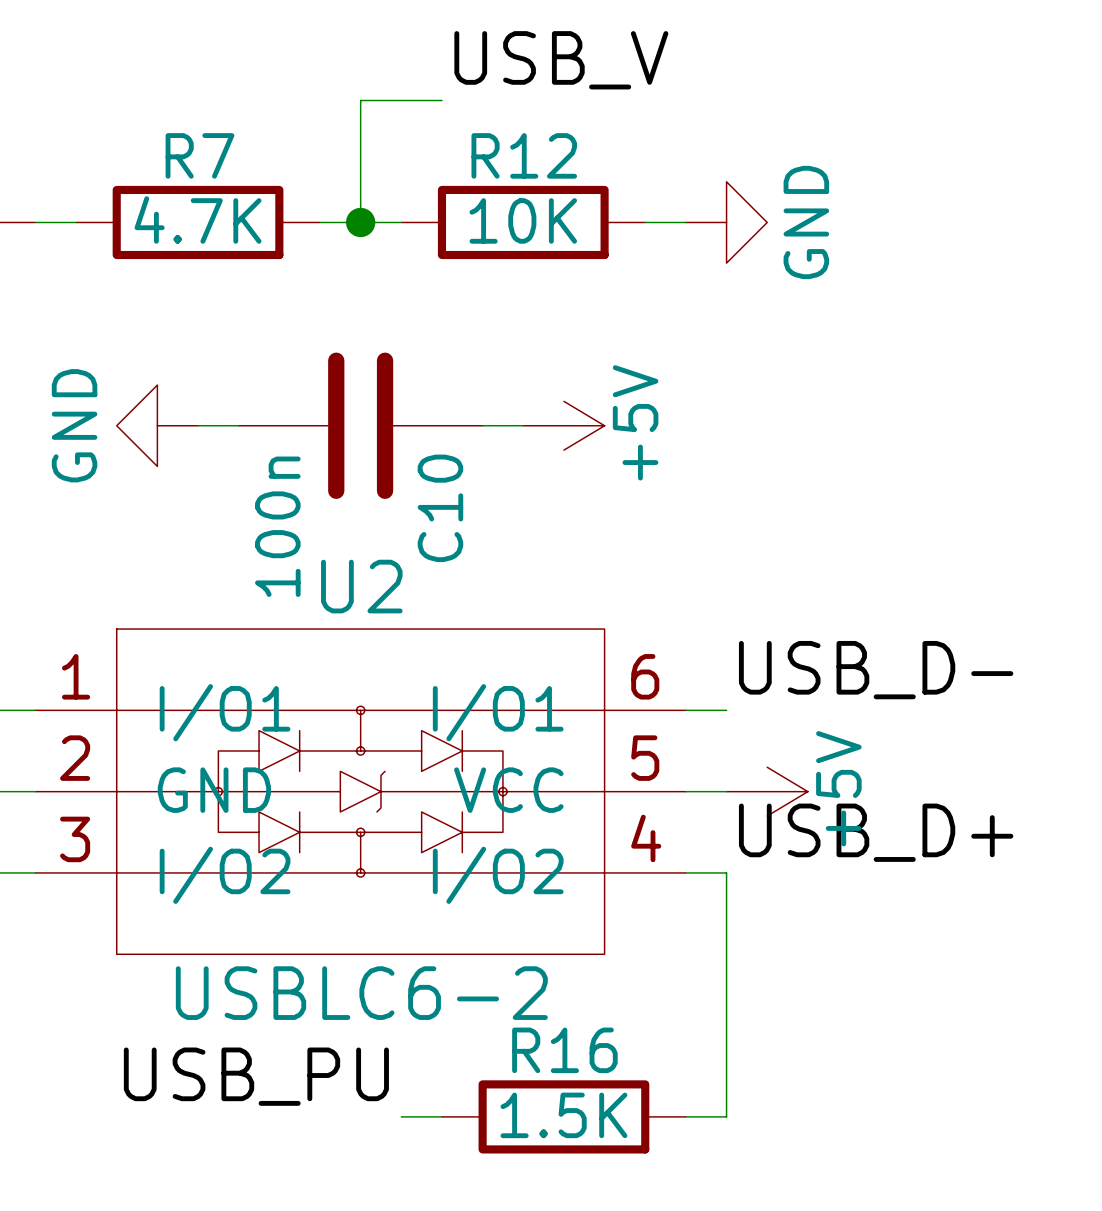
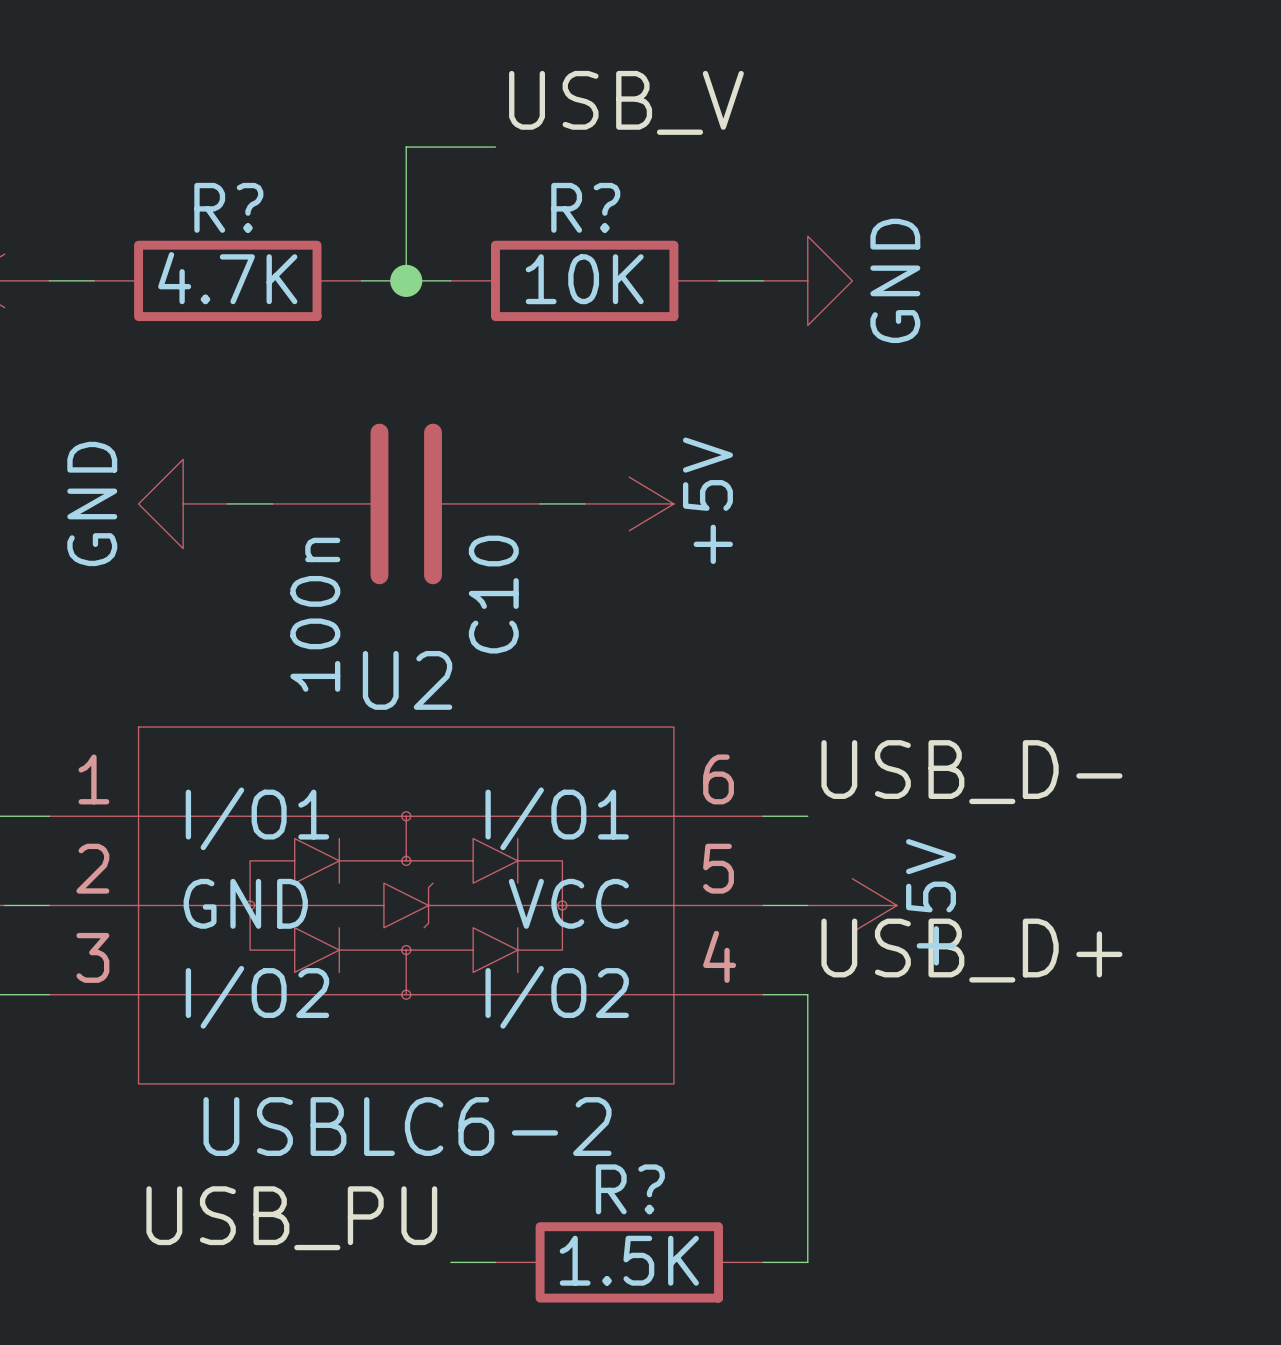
R7 name: R7 (199, 155) -> R? (228, 207)
R12 name: R12 (524, 155) -> R? (585, 207)
R16 name: R16 (564, 1050) -> R? (630, 1189)

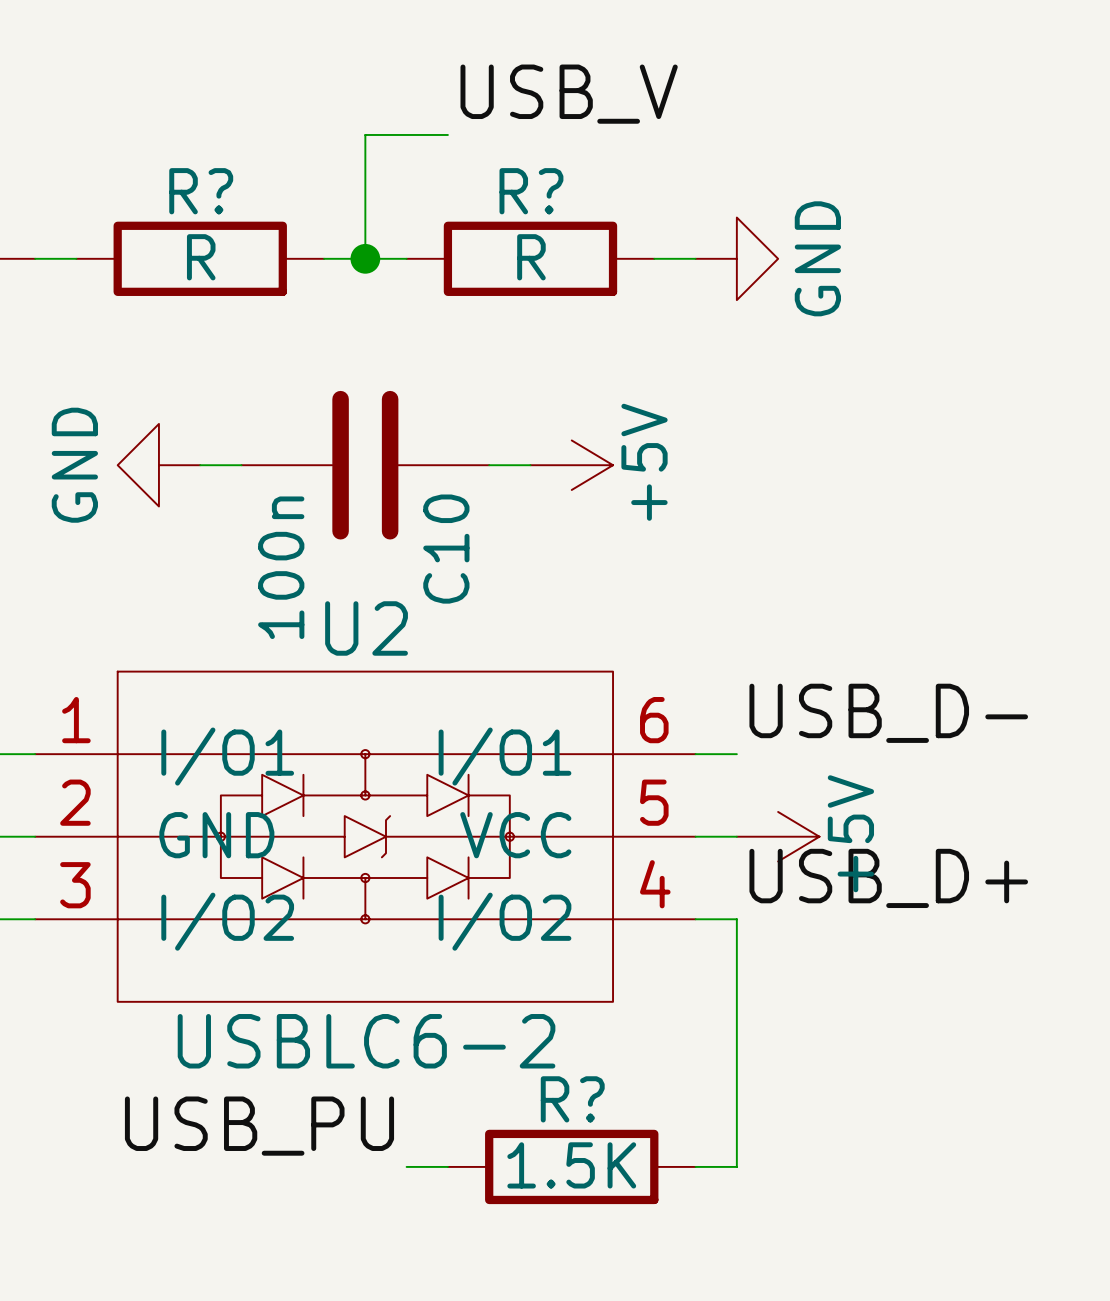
R? value: 4.7K (227, 278) -> R (201, 257)
R? value: 10K (584, 279) -> R (531, 257)

